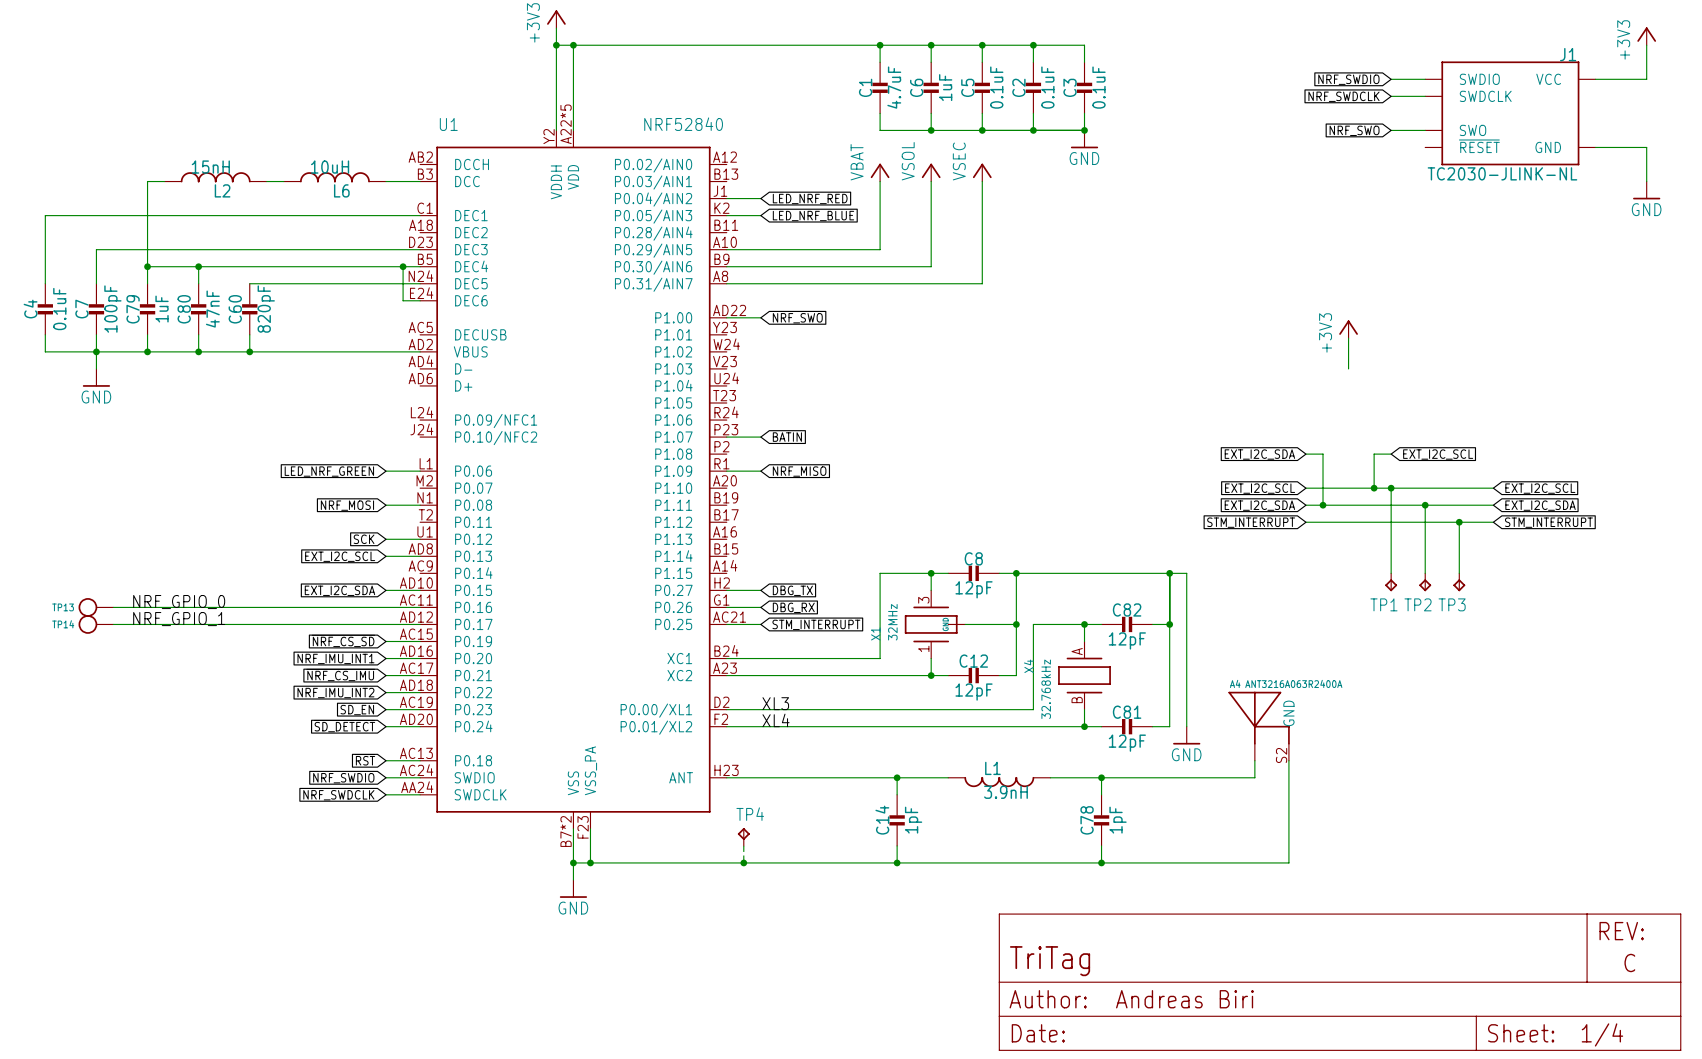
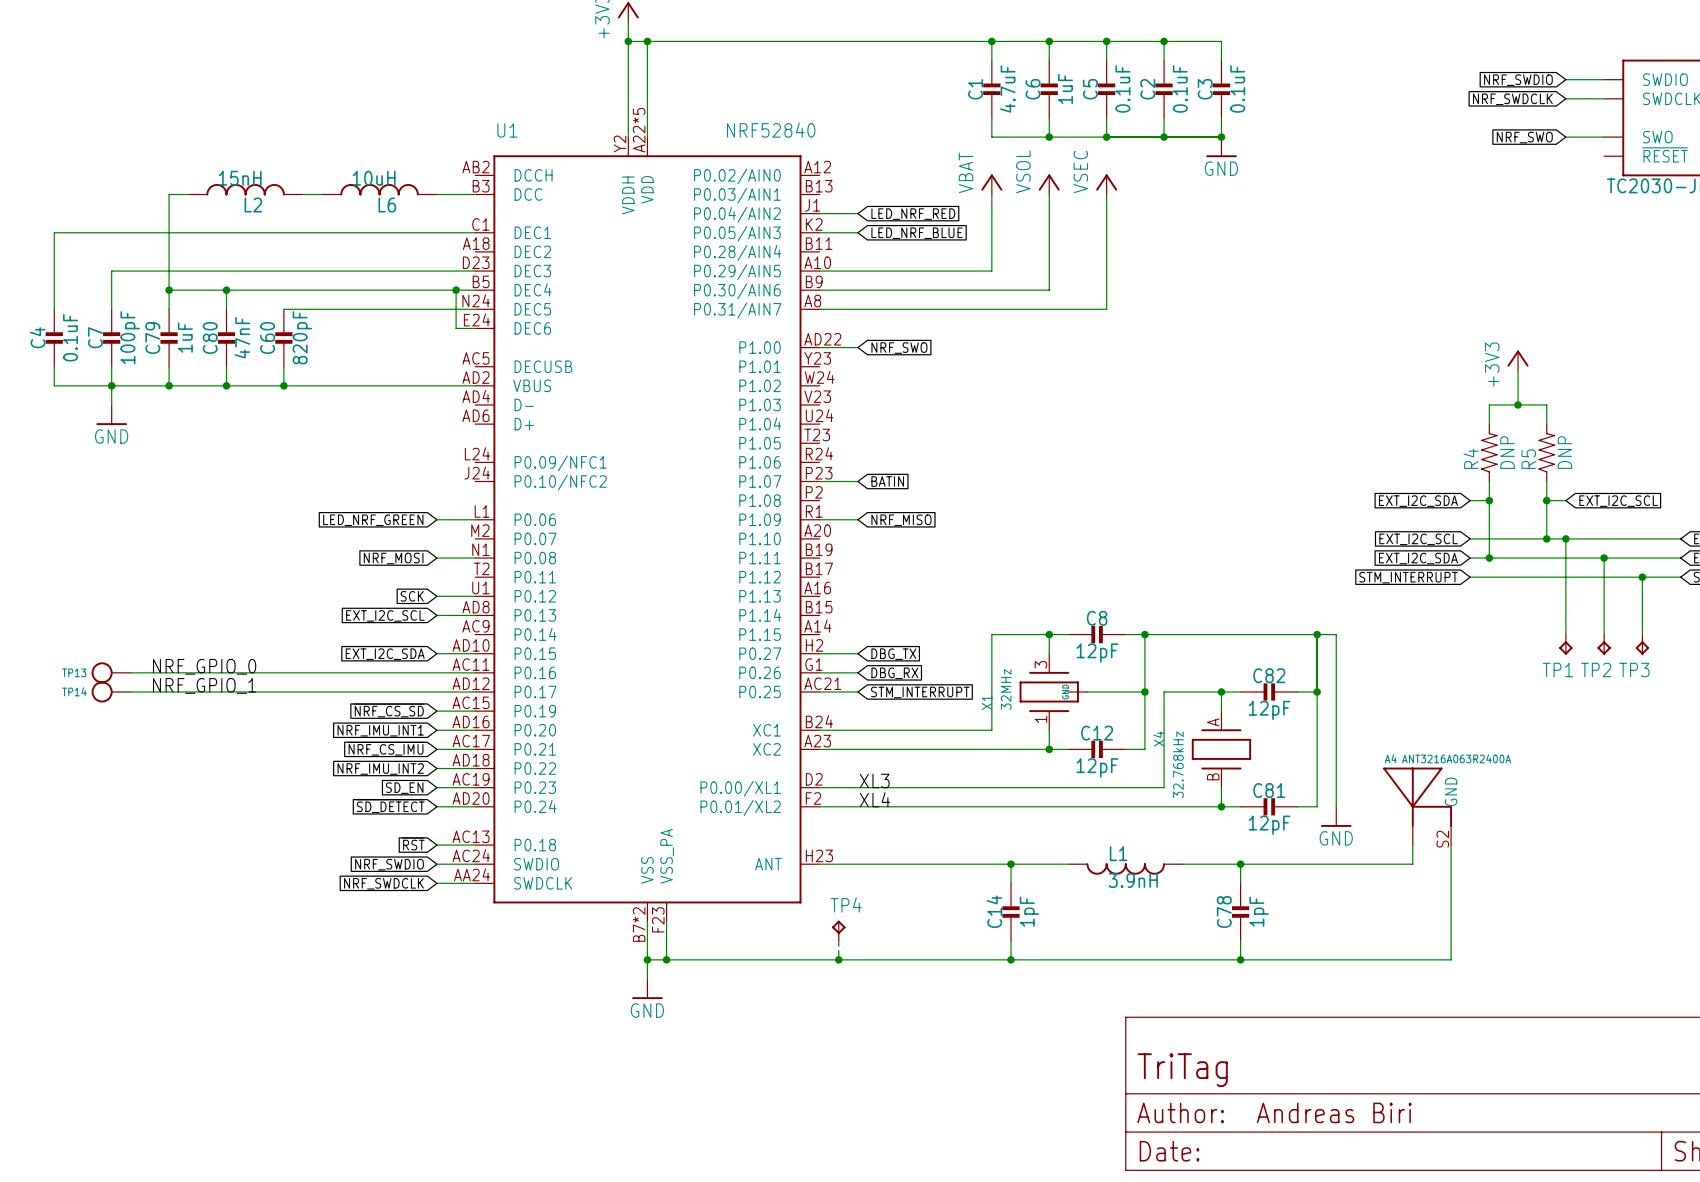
junction: none -> (1518, 404)
wire: none -> (1489, 424) (1489, 404) (1546, 404) (1546, 424)
R4: none -> DNP (1489, 452)
R5: none -> DNP (1546, 452)
wire: none -> (1489, 481) (1489, 500)
wire: none -> (1546, 481) (1546, 500)
junction: none -> (1489, 500)
junction: none -> (1546, 500)

